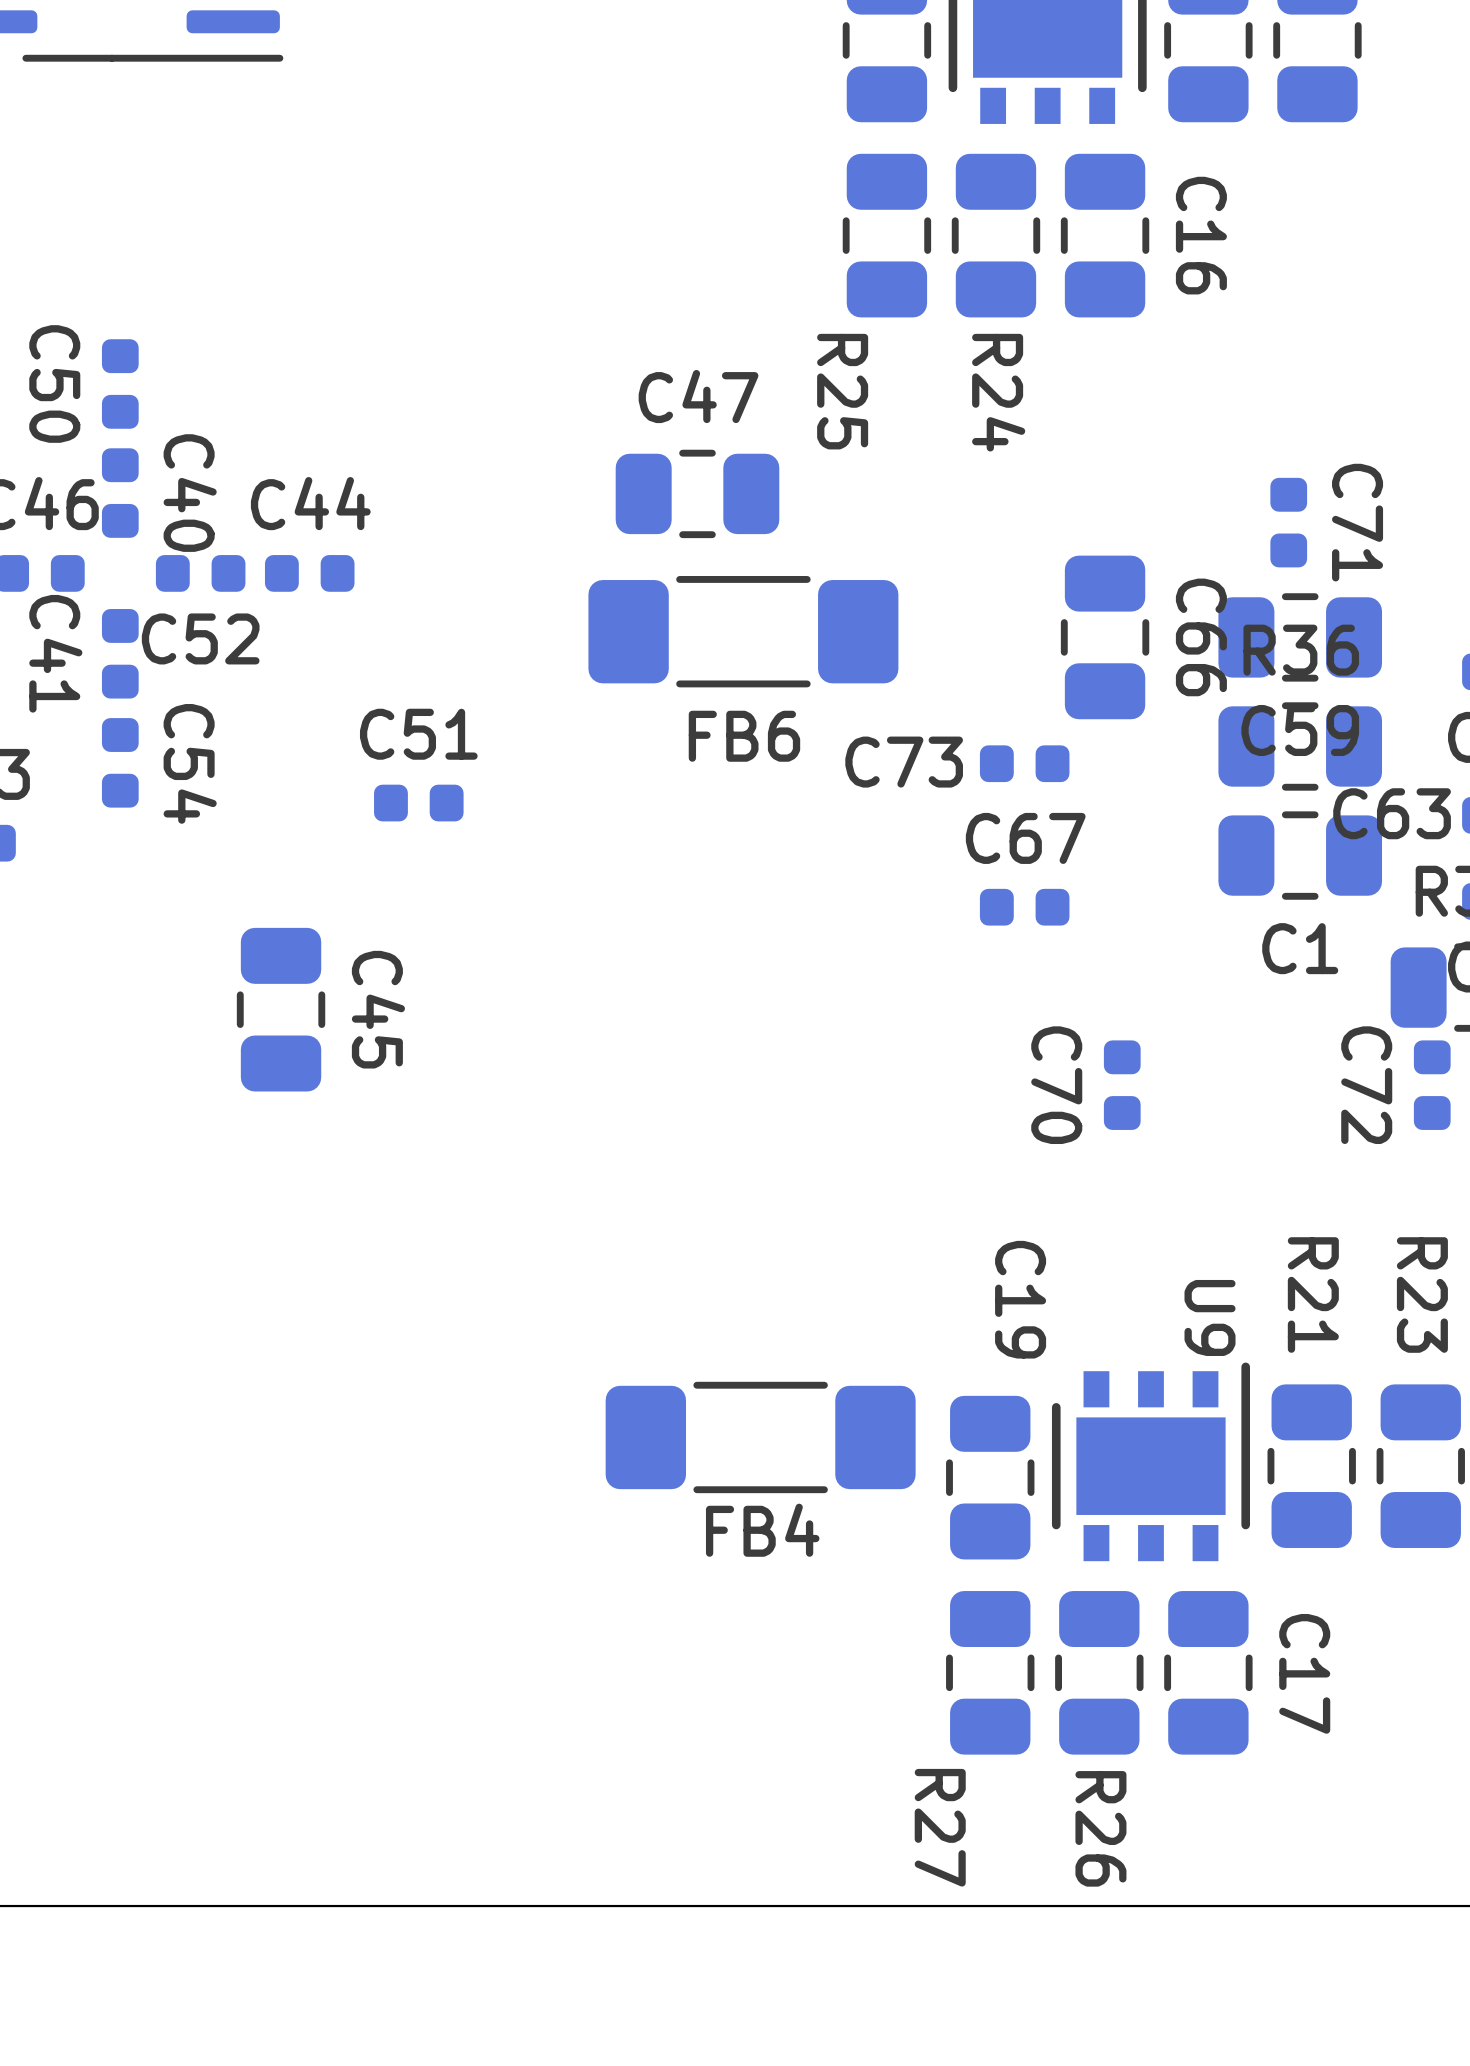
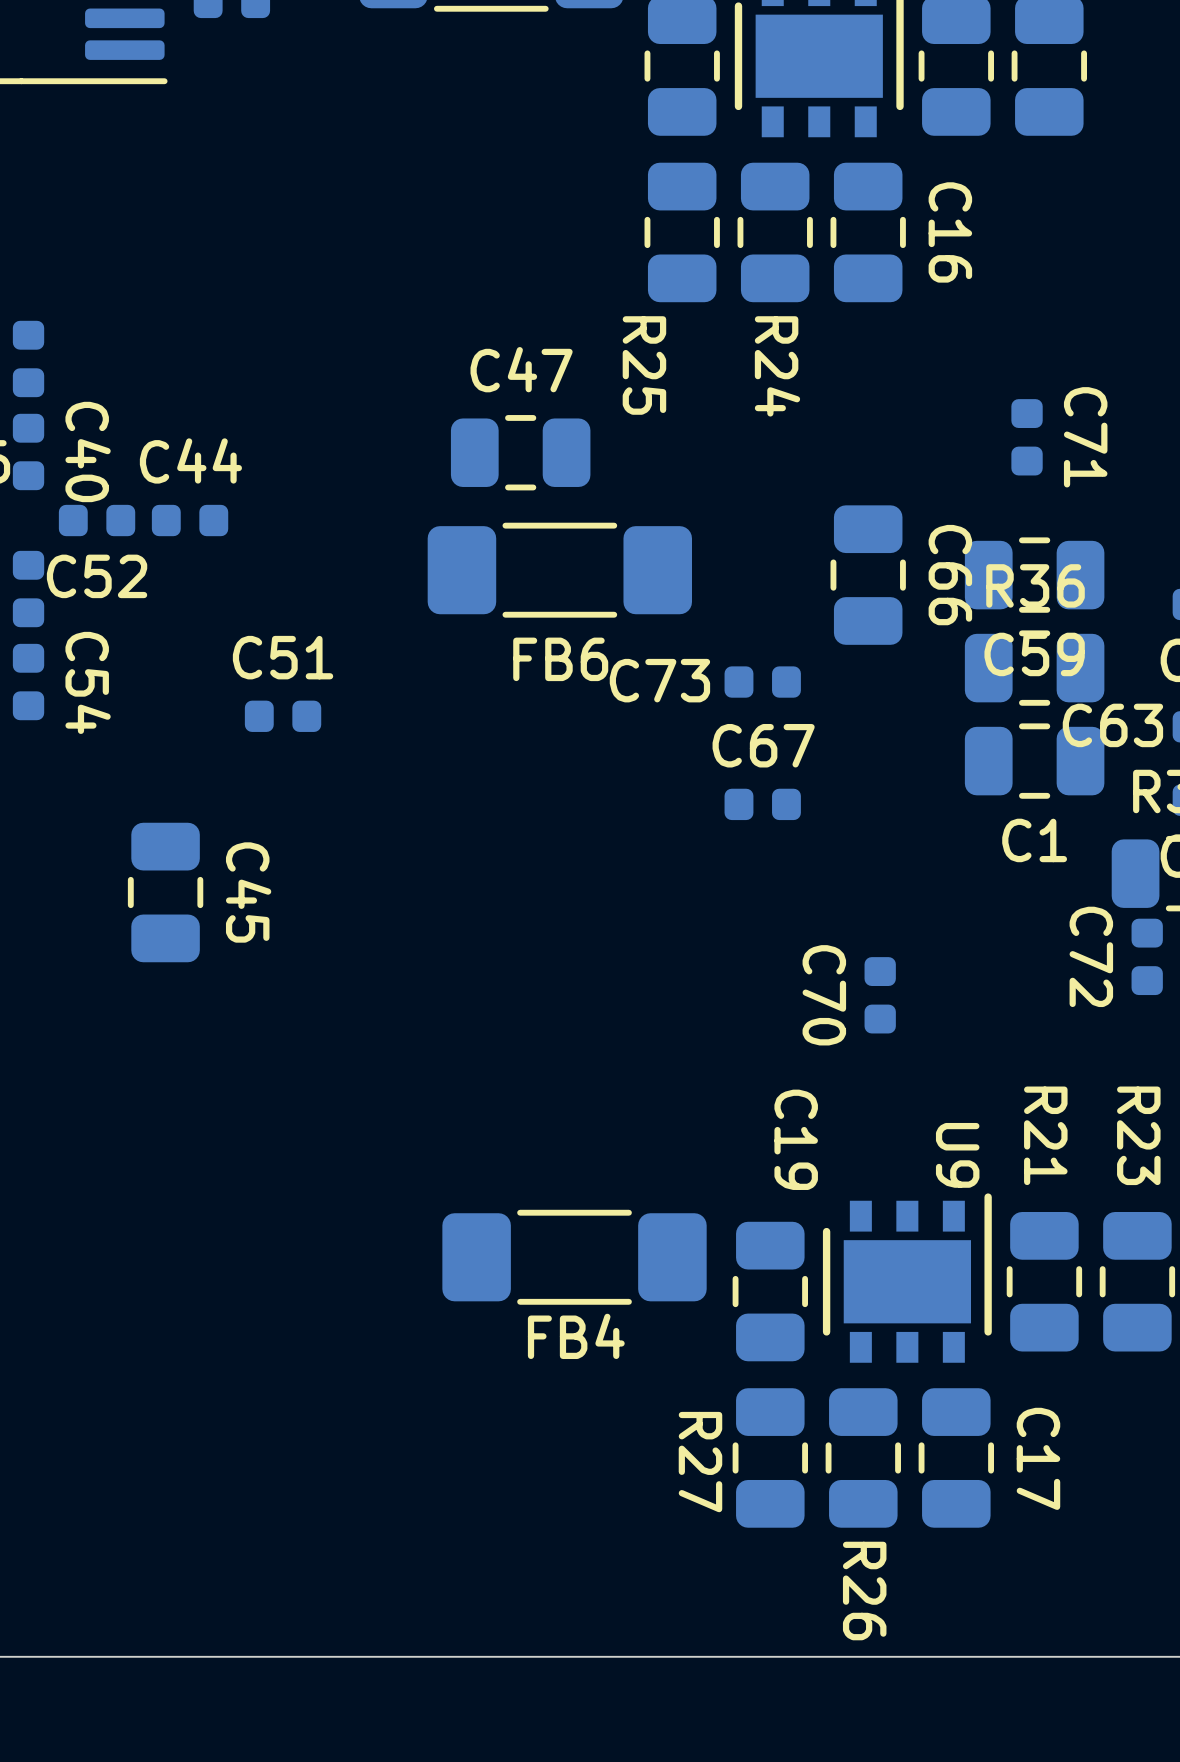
C71 position: (1288, 522) -> (1027, 437)
C73 position: (1024, 763) -> (762, 682)
C67 position: (1024, 907) -> (762, 804)
C70 position: (1122, 1085) -> (880, 995)
R27 name position: R27 (940, 1827) -> R27 (700, 1462)

